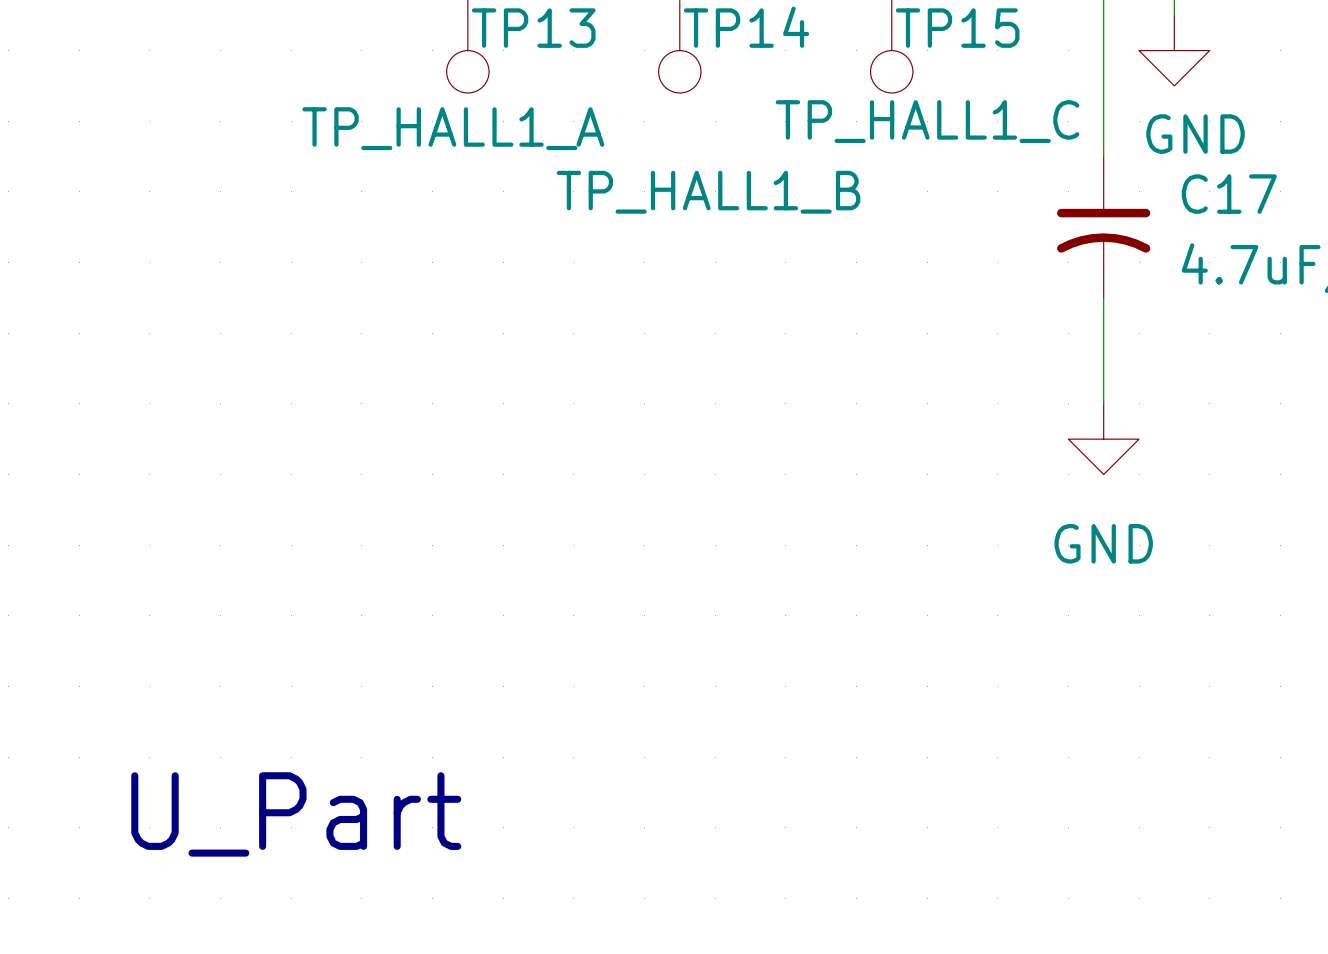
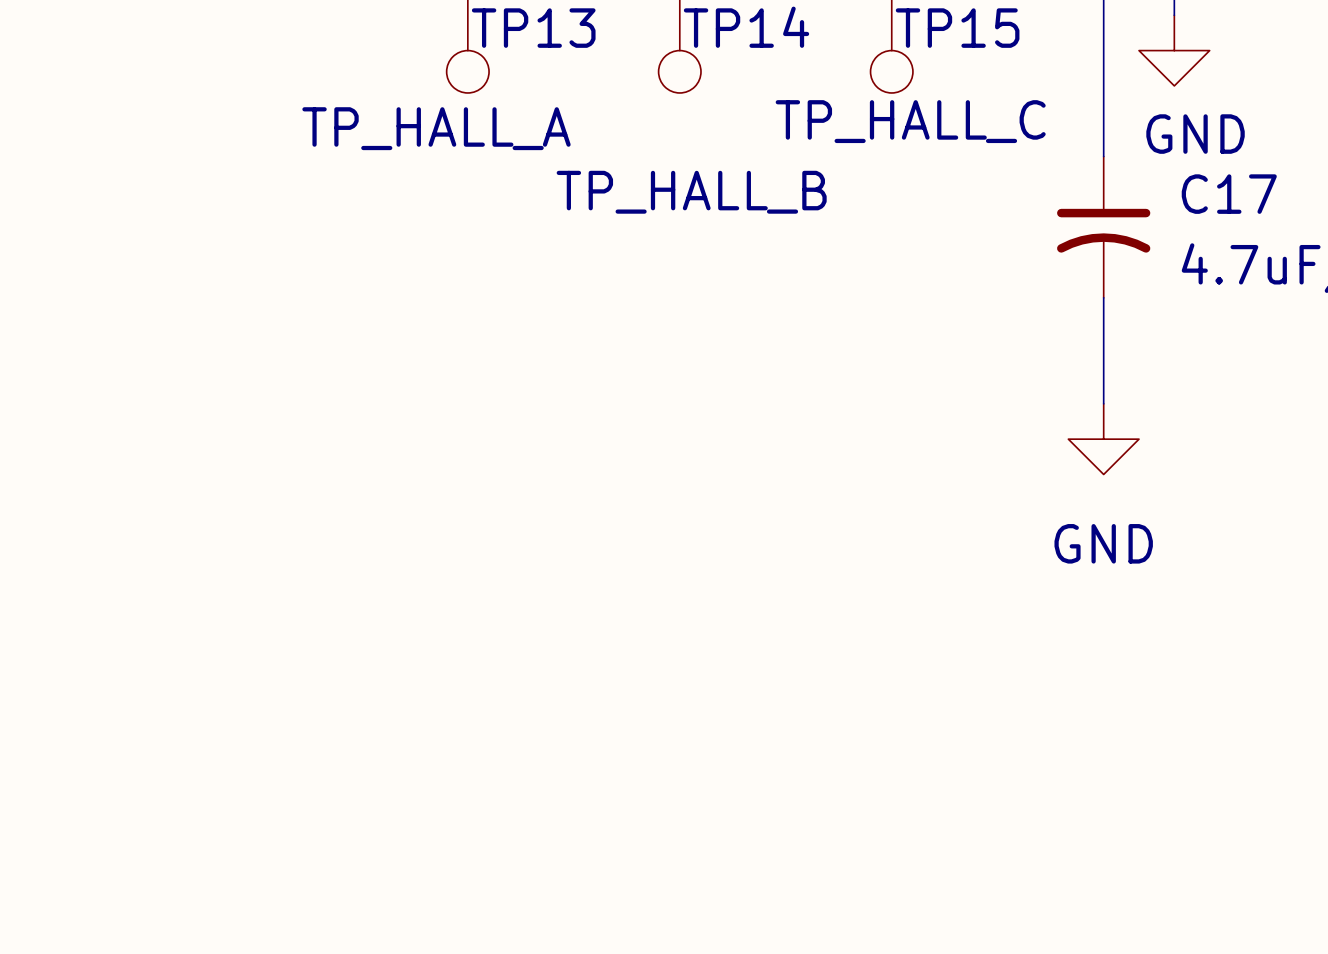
TP15 value: TP_HALL1_C (927, 121) -> TP_HALL_C (910, 121)
TP13 value: TP_HALL1_A (453, 128) -> TP_HALL_A (436, 128)
TP14 value: TP_HALL1_B (708, 192) -> TP_HALL_B (691, 192)
text: U_Part (296, 814) -> none

